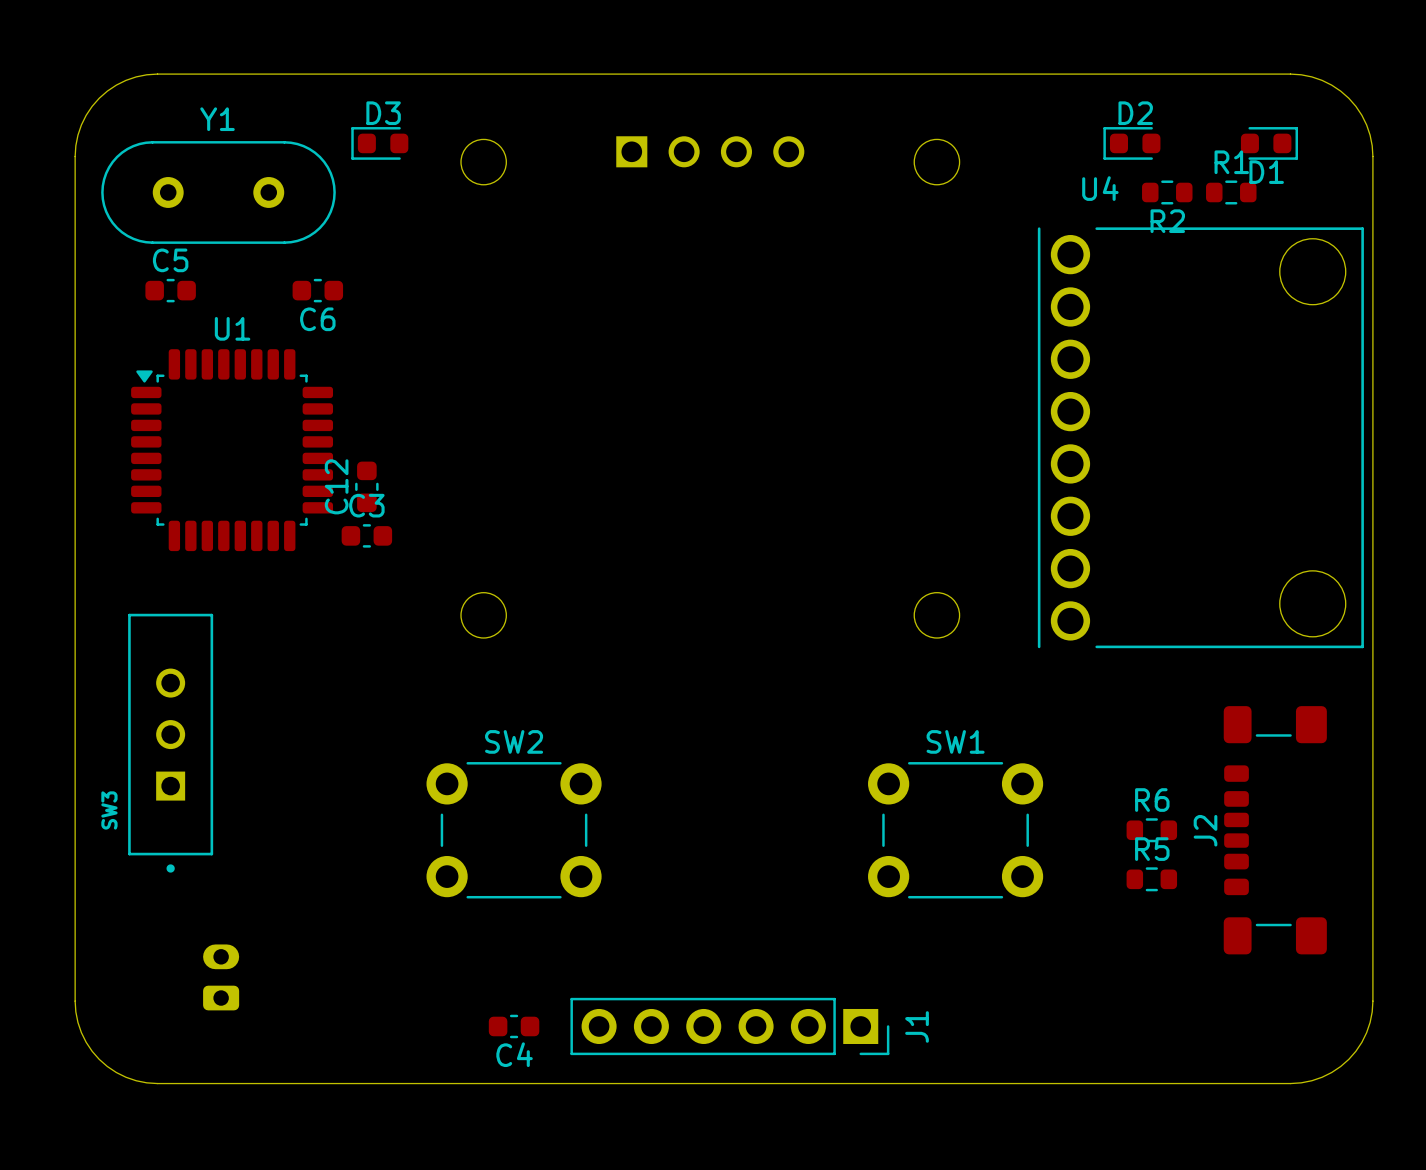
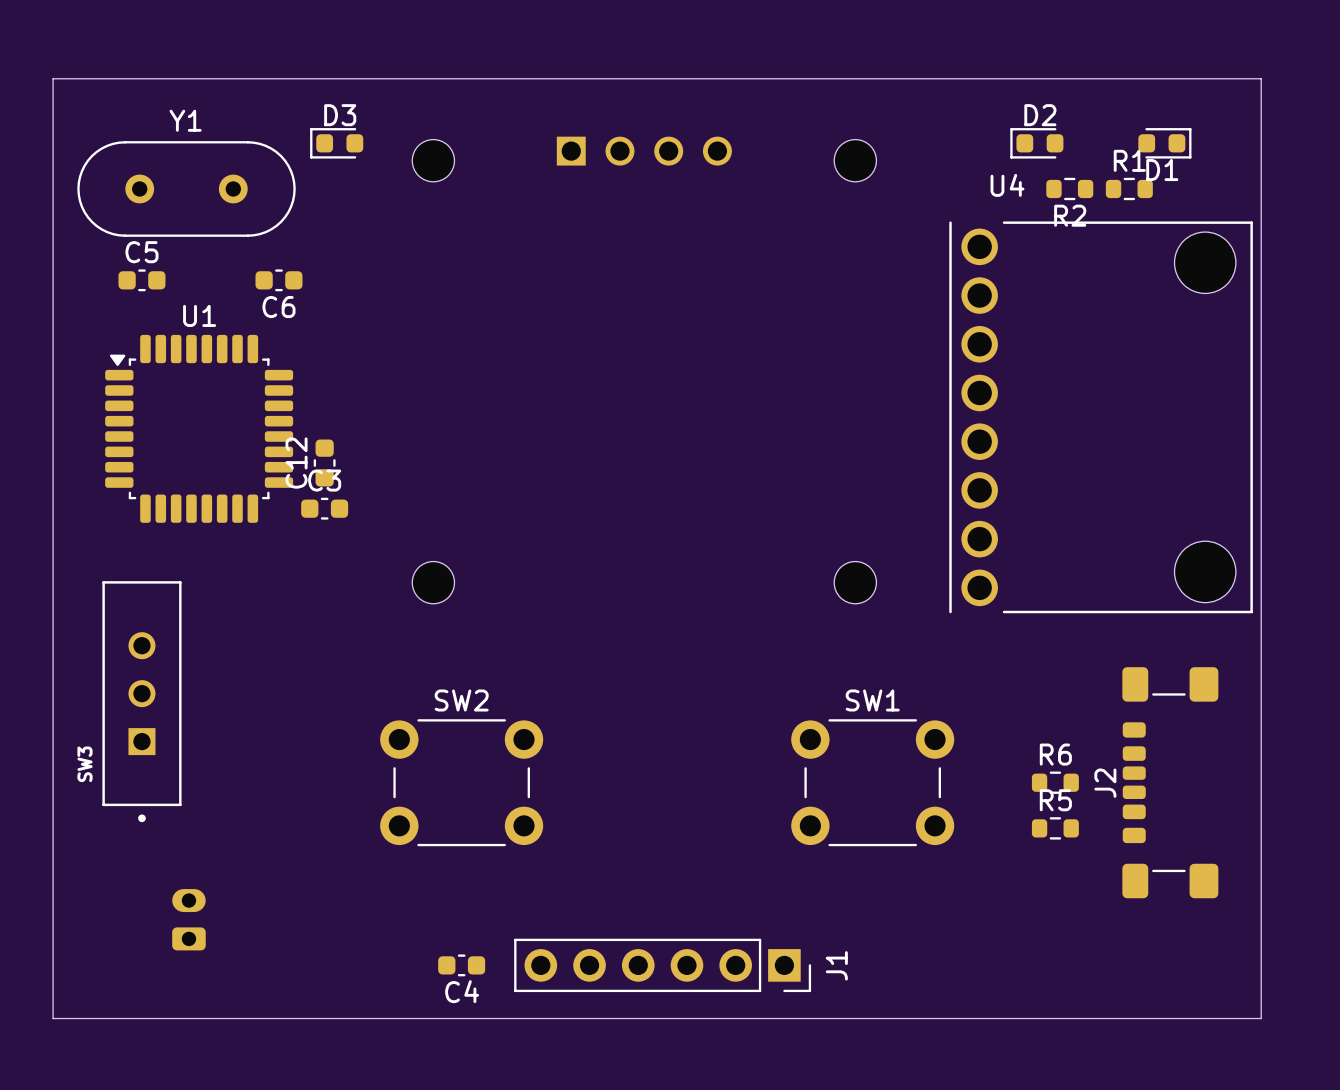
board edge: (157, 74) (126, 80) (99, 98) (81, 124) (75, 156) -> (129, 78) (53, 78) (53, 155)
board edge: (1290, 74) (1322, 80) (1348, 98) (1366, 124) (1372, 156) -> (1184, 78) (1261, 78) (1261, 155)
board edge: (75, 1001) (81, 1032) (99, 1059) (126, 1077) (157, 1083) -> (53, 941) (53, 1018) (129, 1018)
board edge: (1372, 1001) (1366, 1032) (1348, 1059) (1322, 1077) (1290, 1083) -> (1261, 941) (1261, 1018) (1184, 1018)

